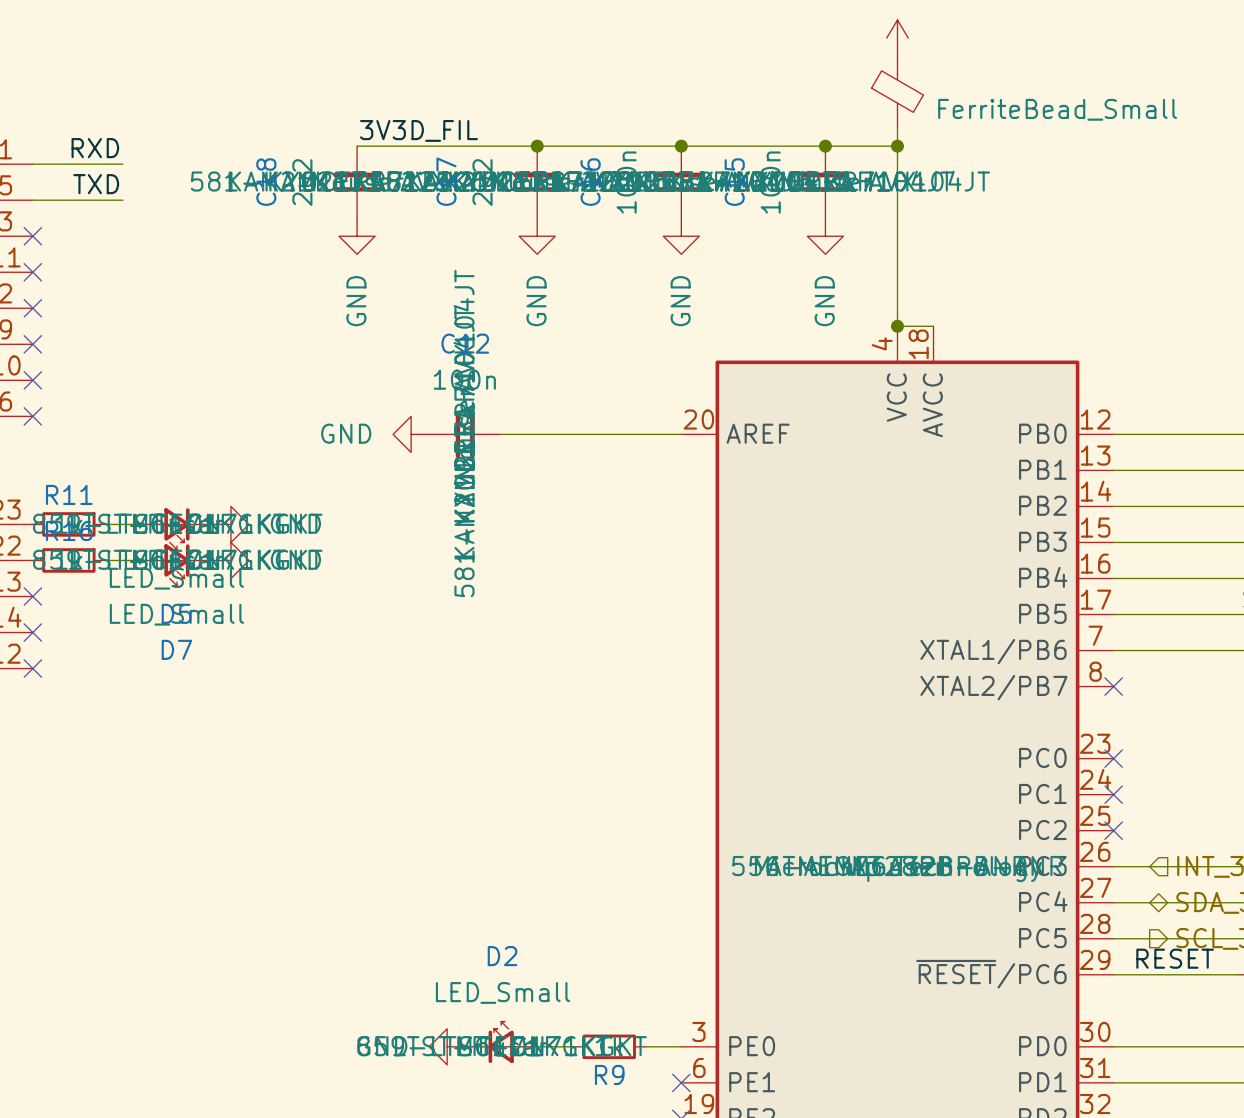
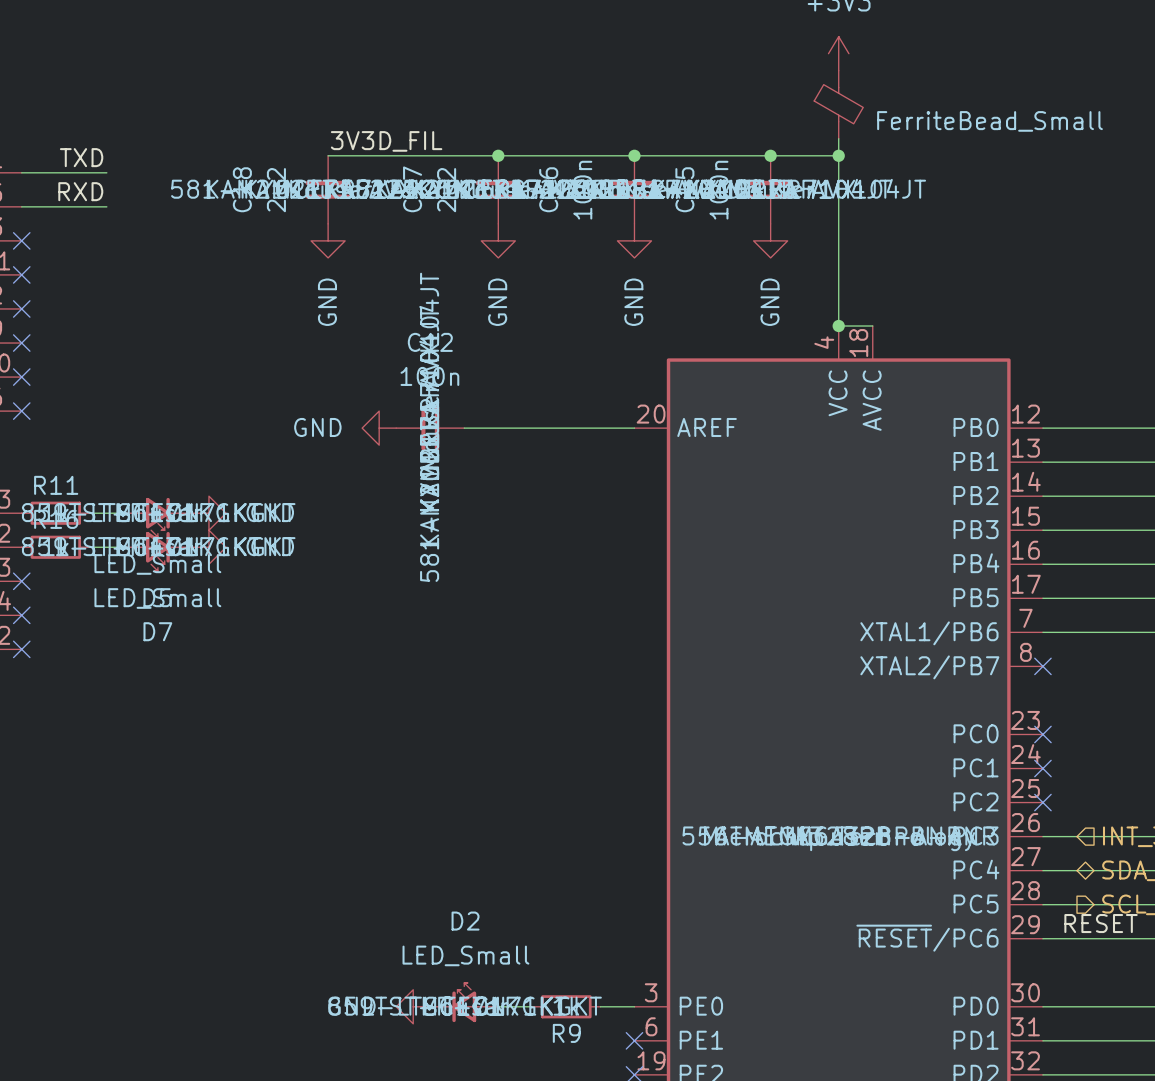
label: RXD (95, 148) -> TXD (81, 157)
label: TXD (96, 184) -> RXD (80, 191)

